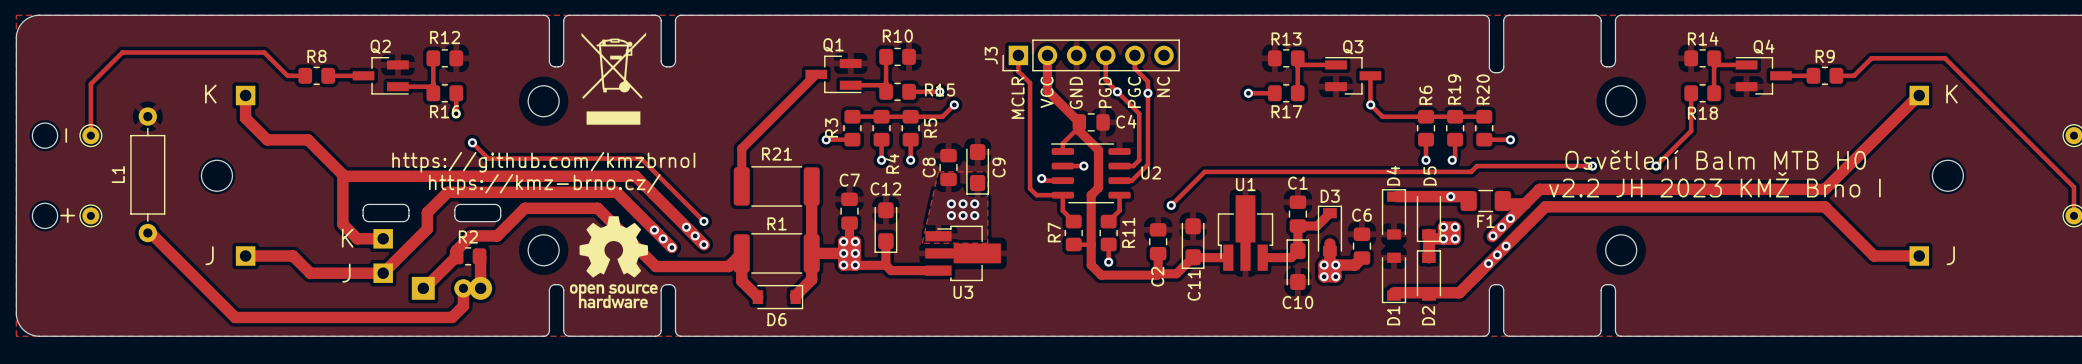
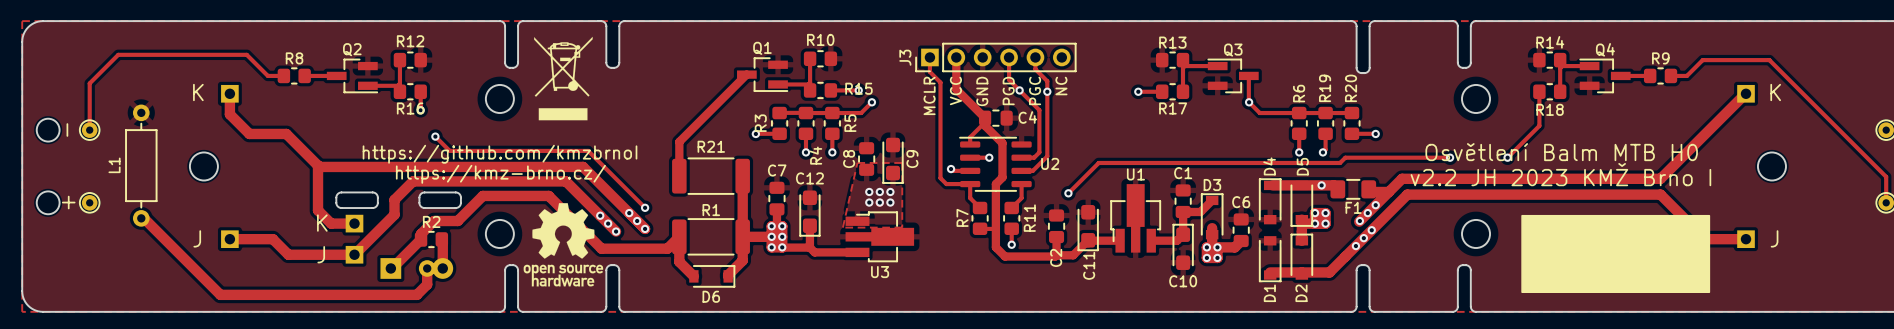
drawing: none -> [1521, 214, 1711, 294]

